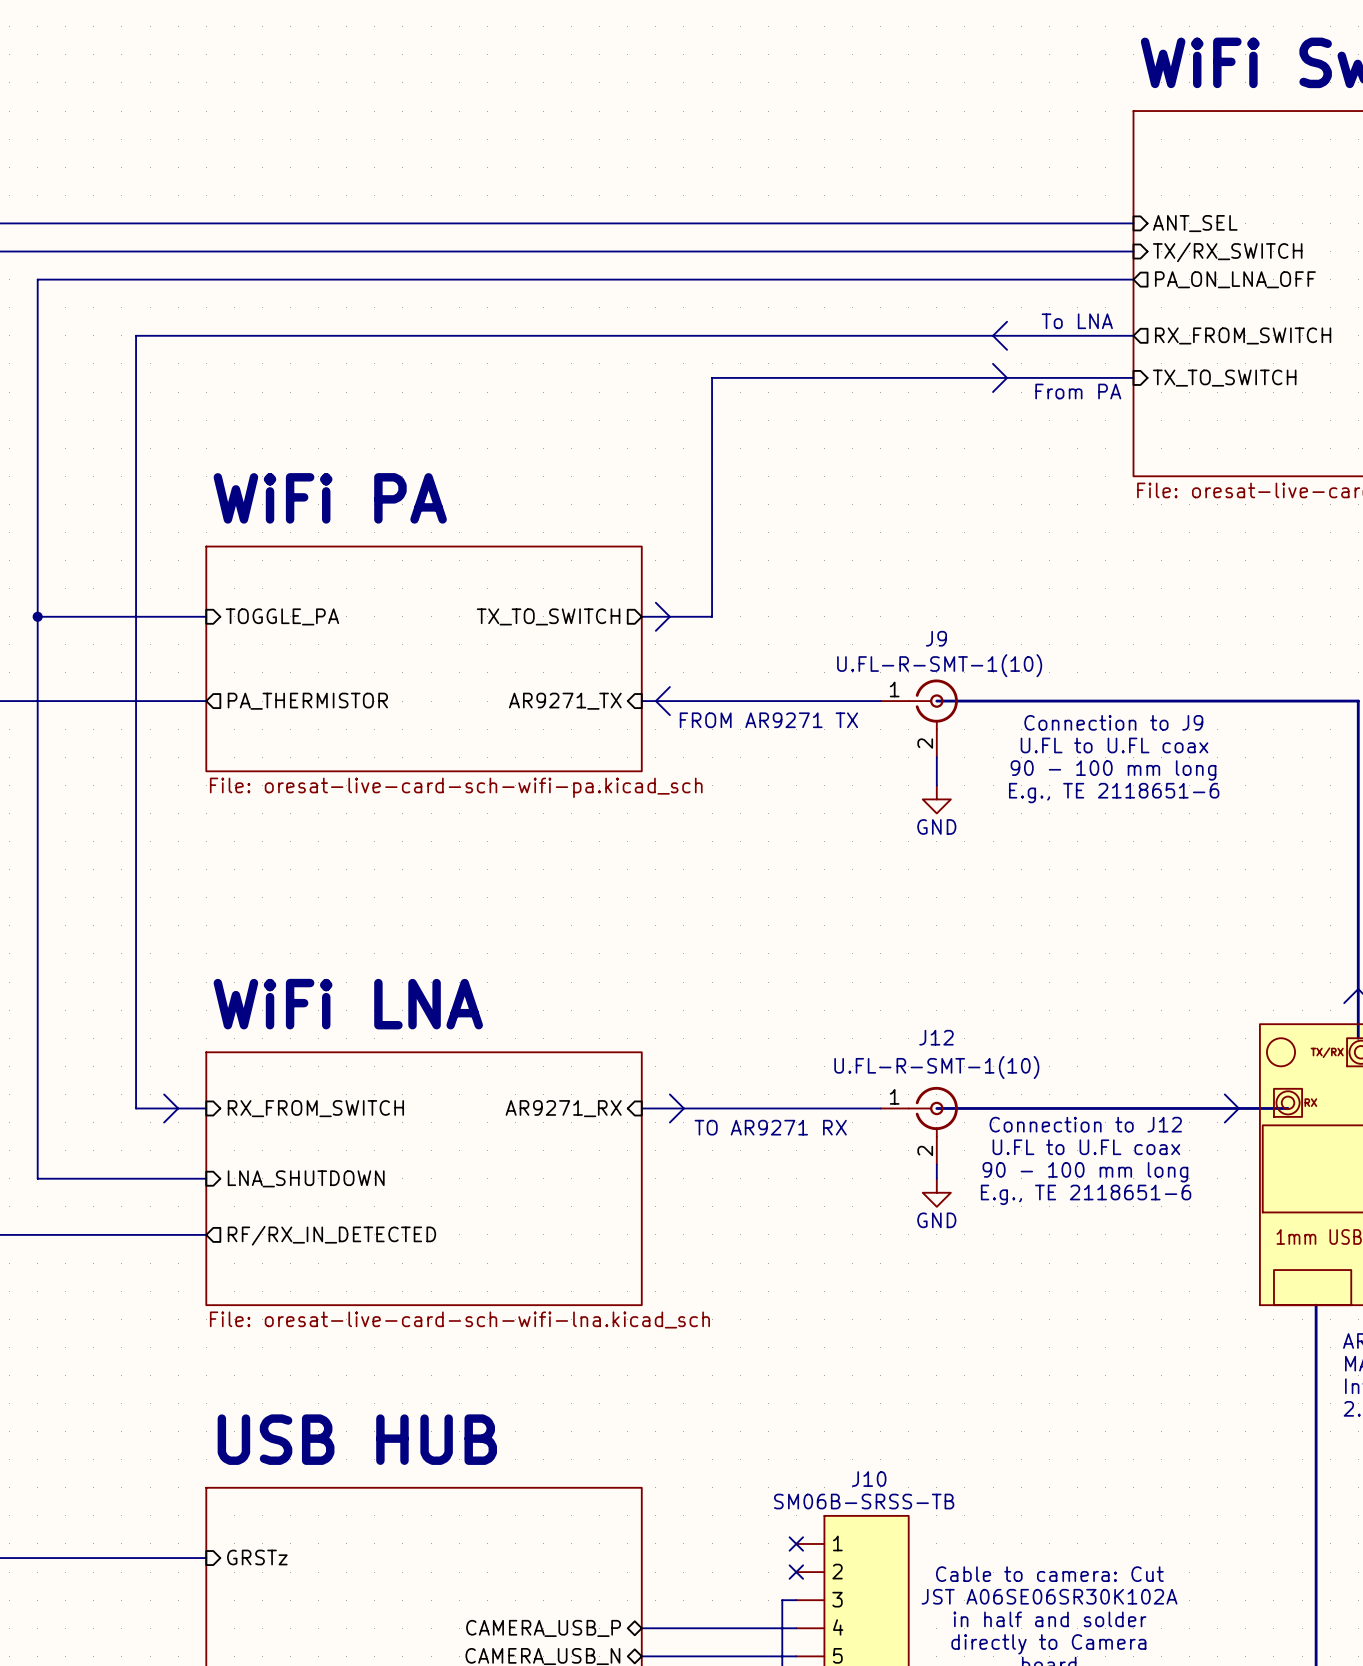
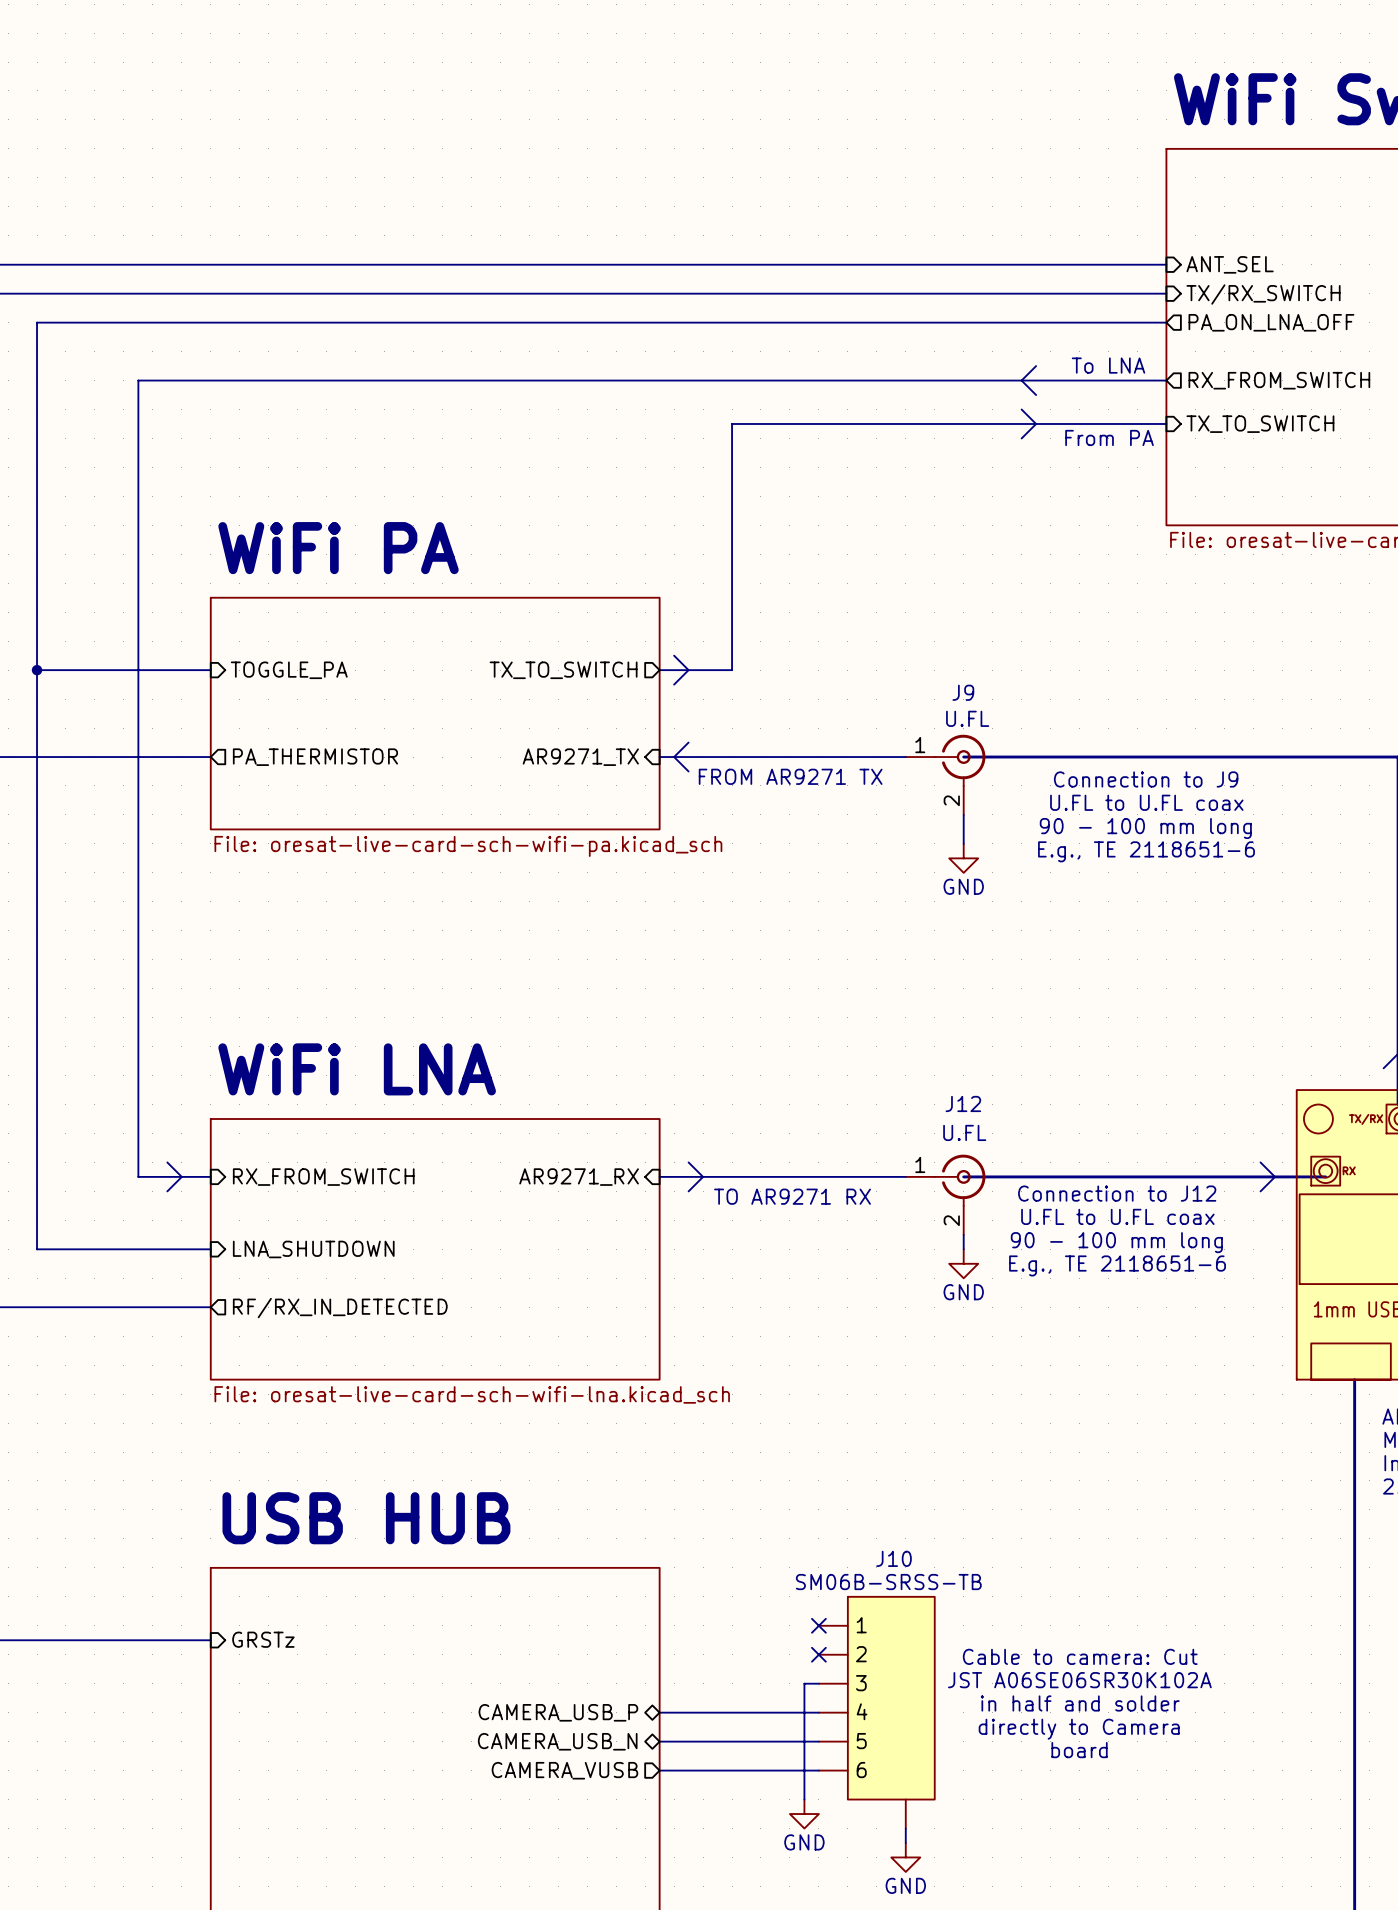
J9 value: U.FL-R-SMT-1(10) (939, 665) -> U.FL (967, 718)
J12 value: U.FL-R-SMT-1(10) (936, 1067) -> U.FL (964, 1132)

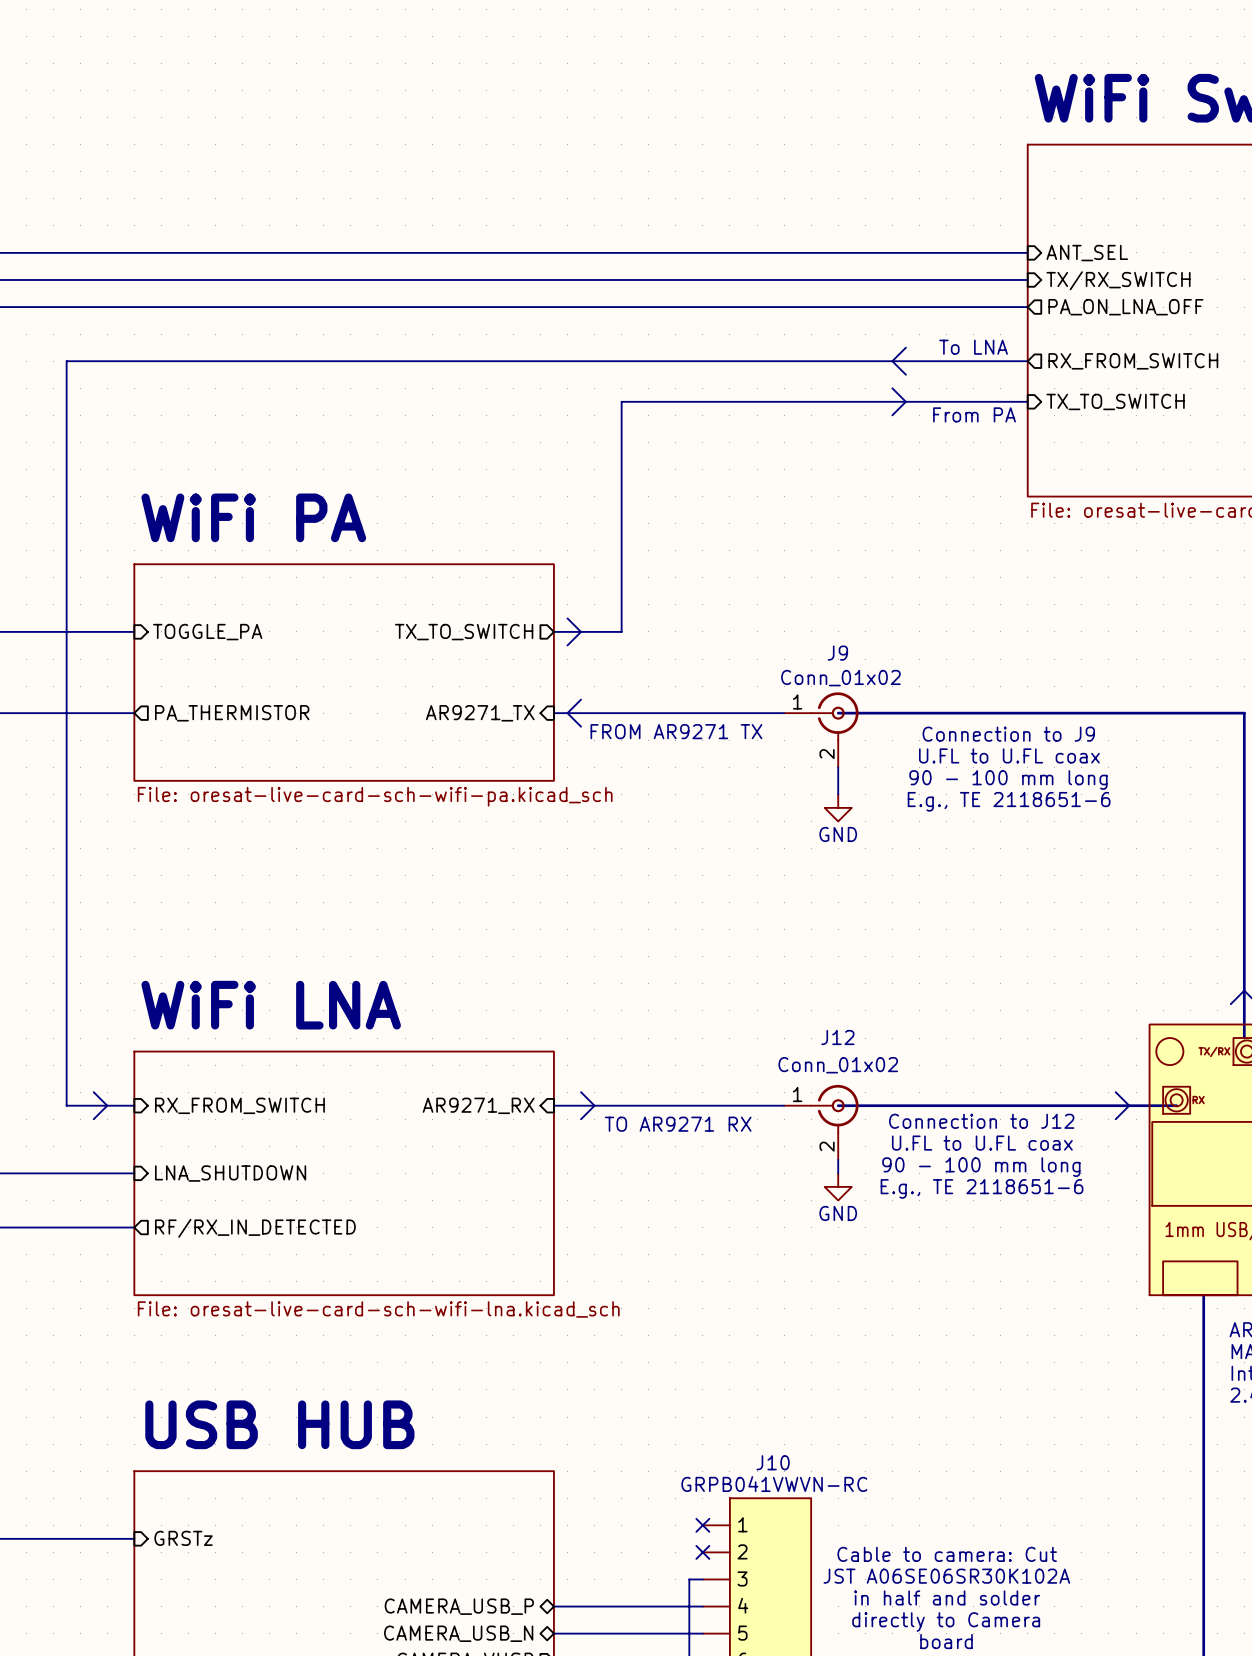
J9 value: U.FL (967, 718) -> Conn_01x02 (840, 678)
J12 value: U.FL (964, 1132) -> Conn_01x02 (838, 1065)
J10 value: SM06B-SRSS-TB (888, 1582) -> GRPB041VWVN-RC (774, 1484)

